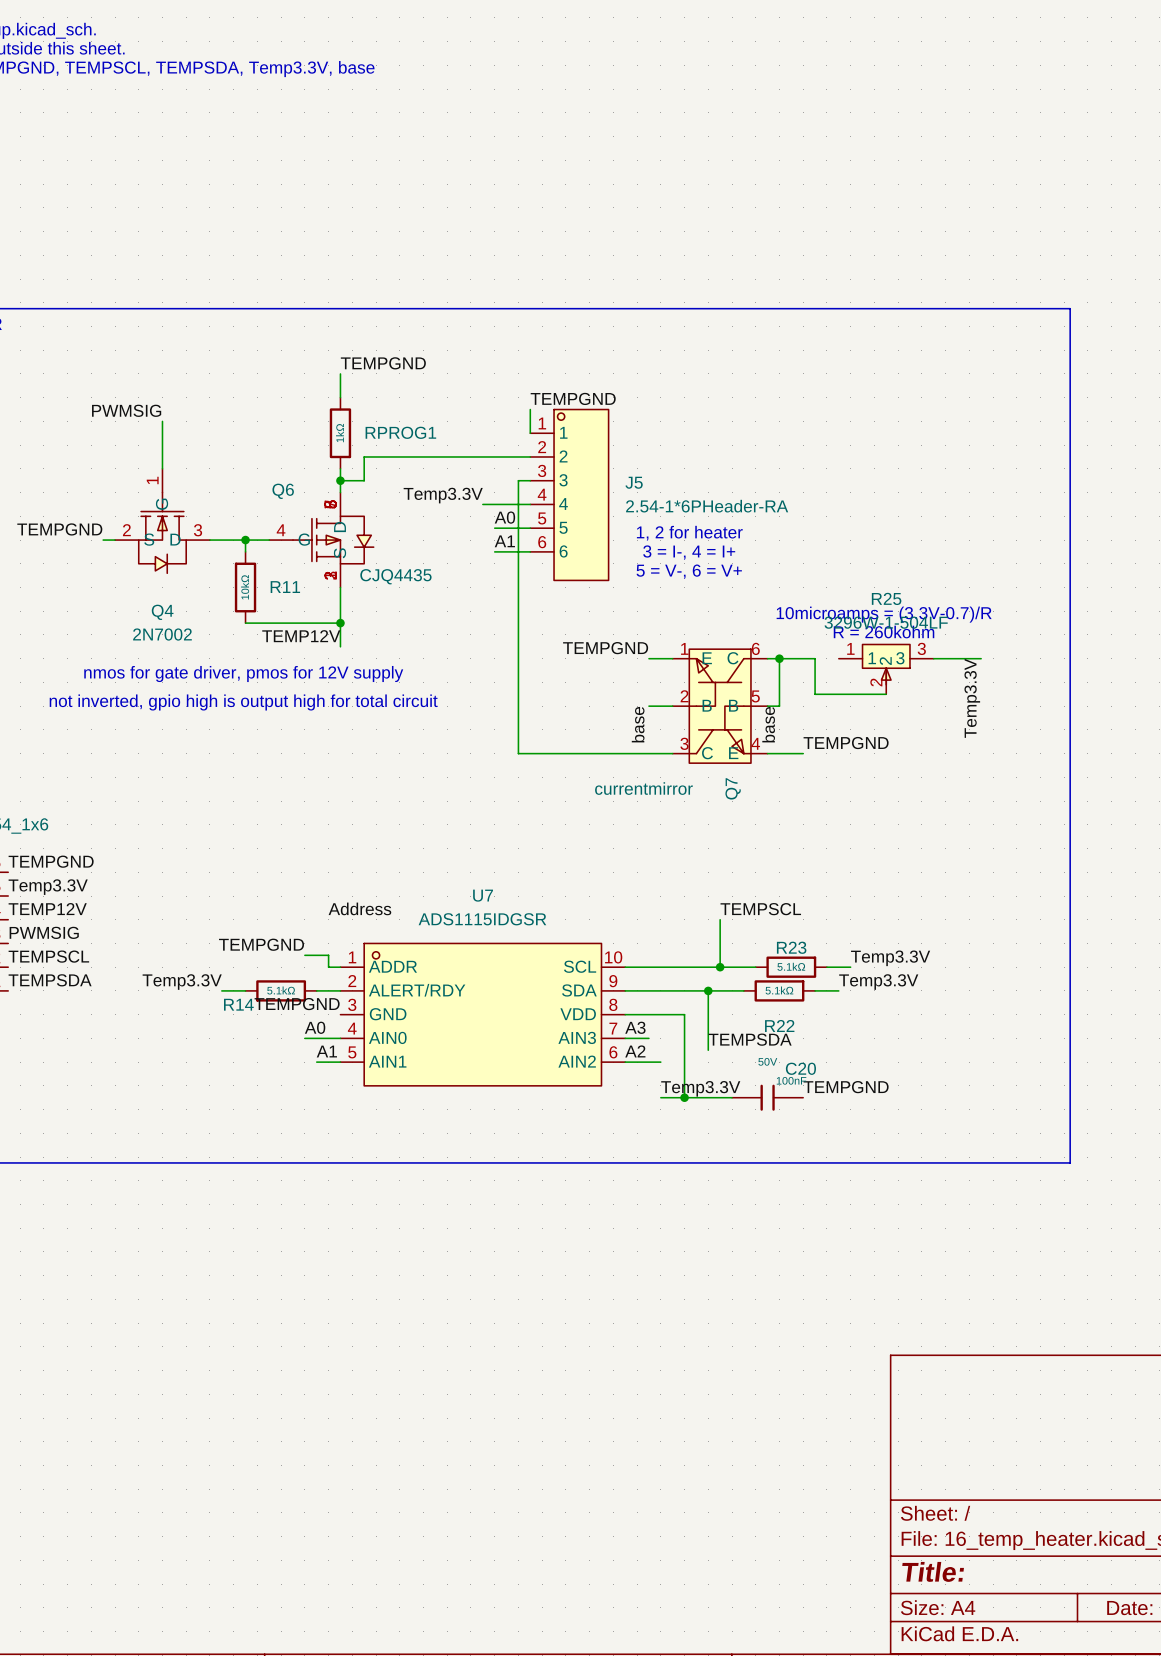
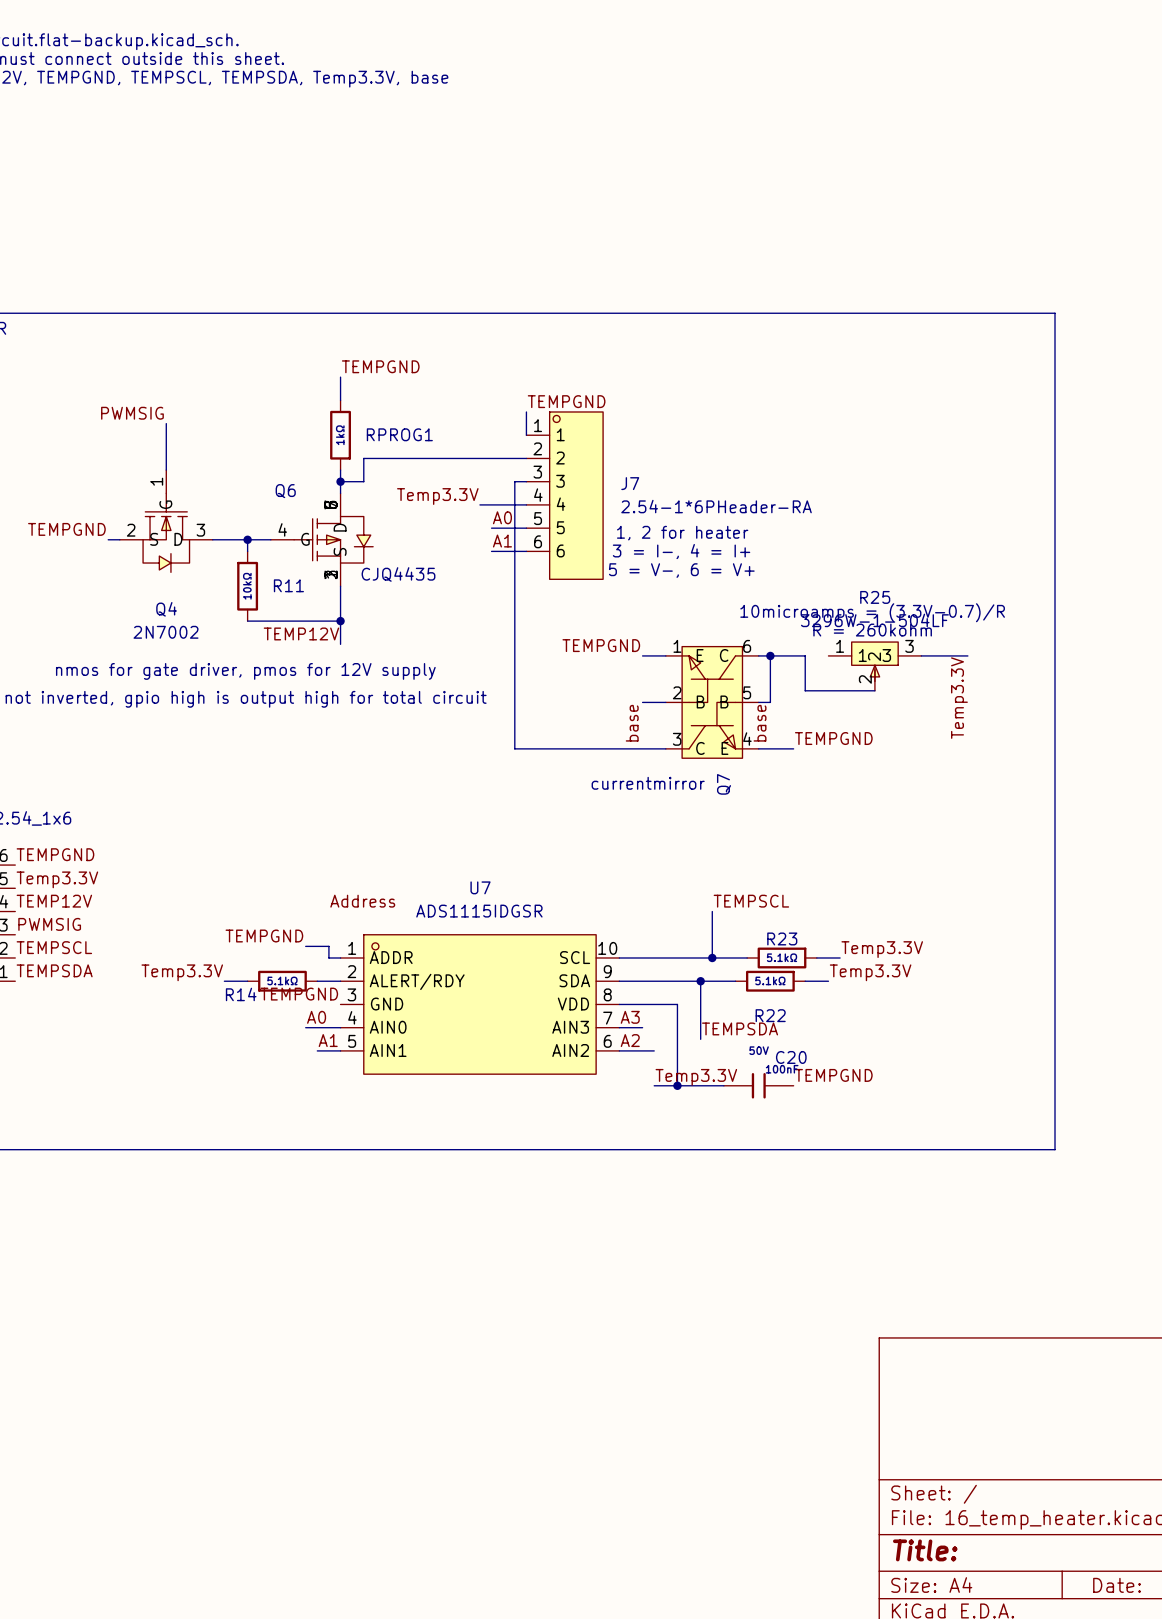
J5 name: J5 (634, 482) -> J7 (630, 483)

